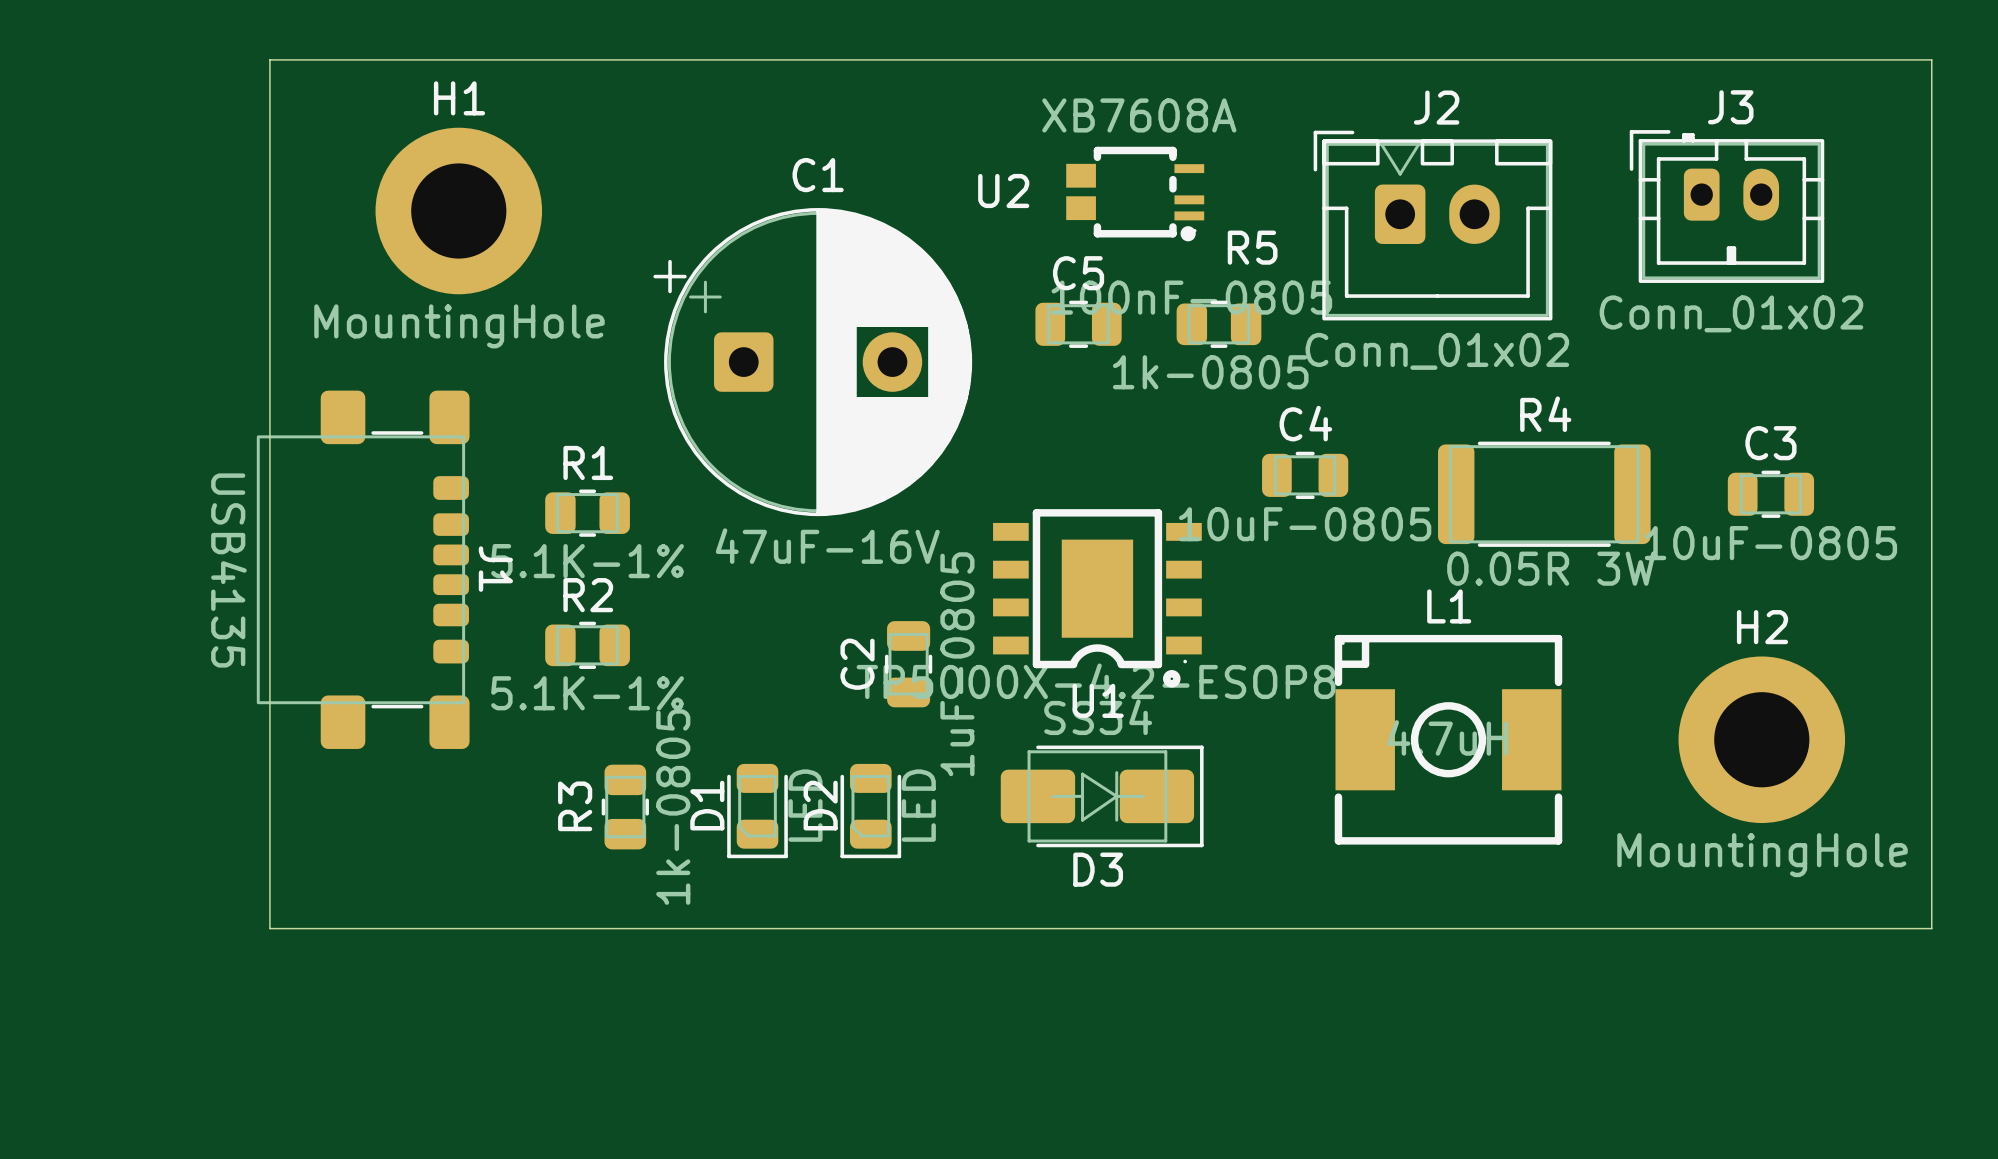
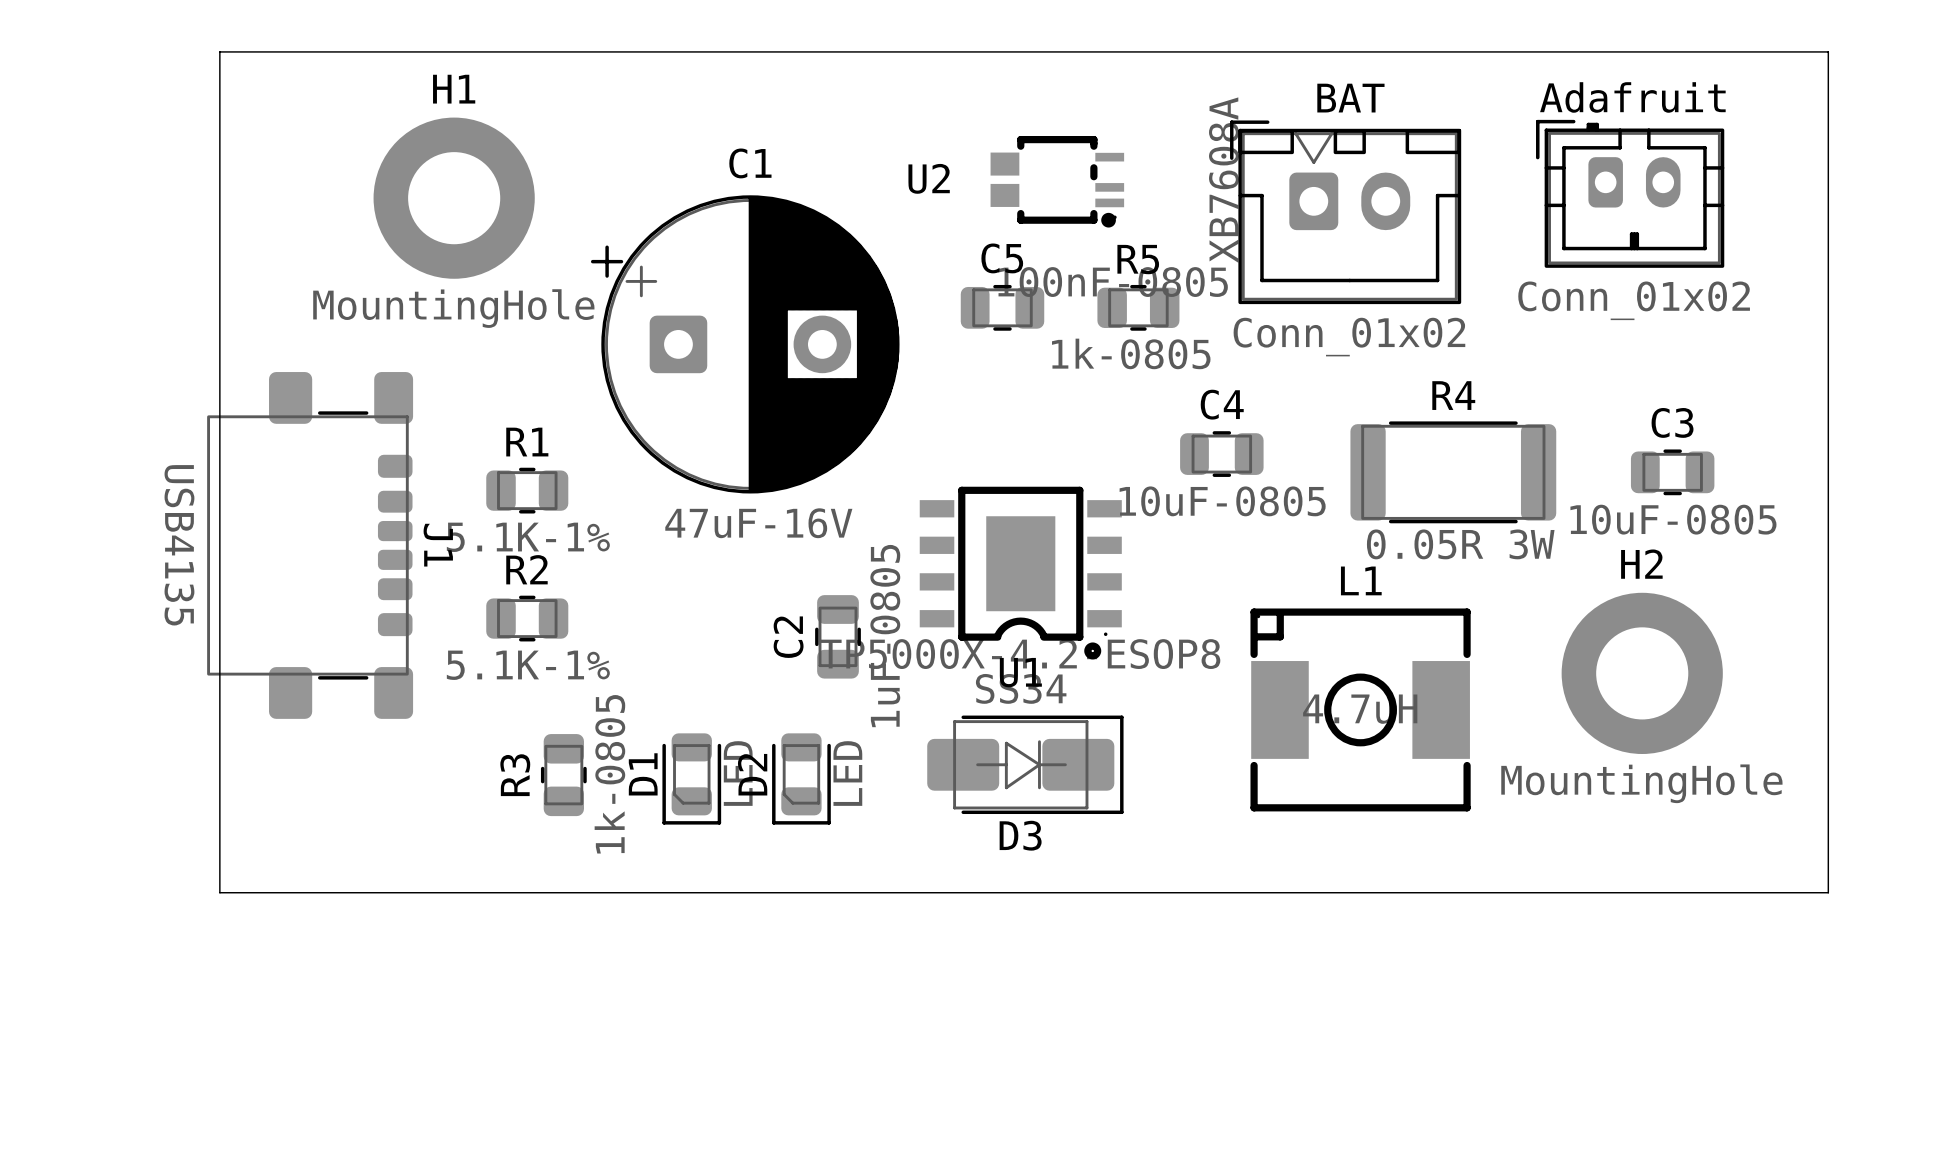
J2 name: J2 (1436, 107) -> BAT (1350, 98)
J3 name: J3 (1730, 107) -> Adafruit (1632, 97)
U2 value rotation: 0° (1139, 115) -> 90° counterclockwise (1223, 180)
H1 position: (458, 210) -> (454, 198)
R5 name position: R5 (1252, 247) -> R5 (1138, 259)
H2 position: (1761, 739) -> (1642, 673)

